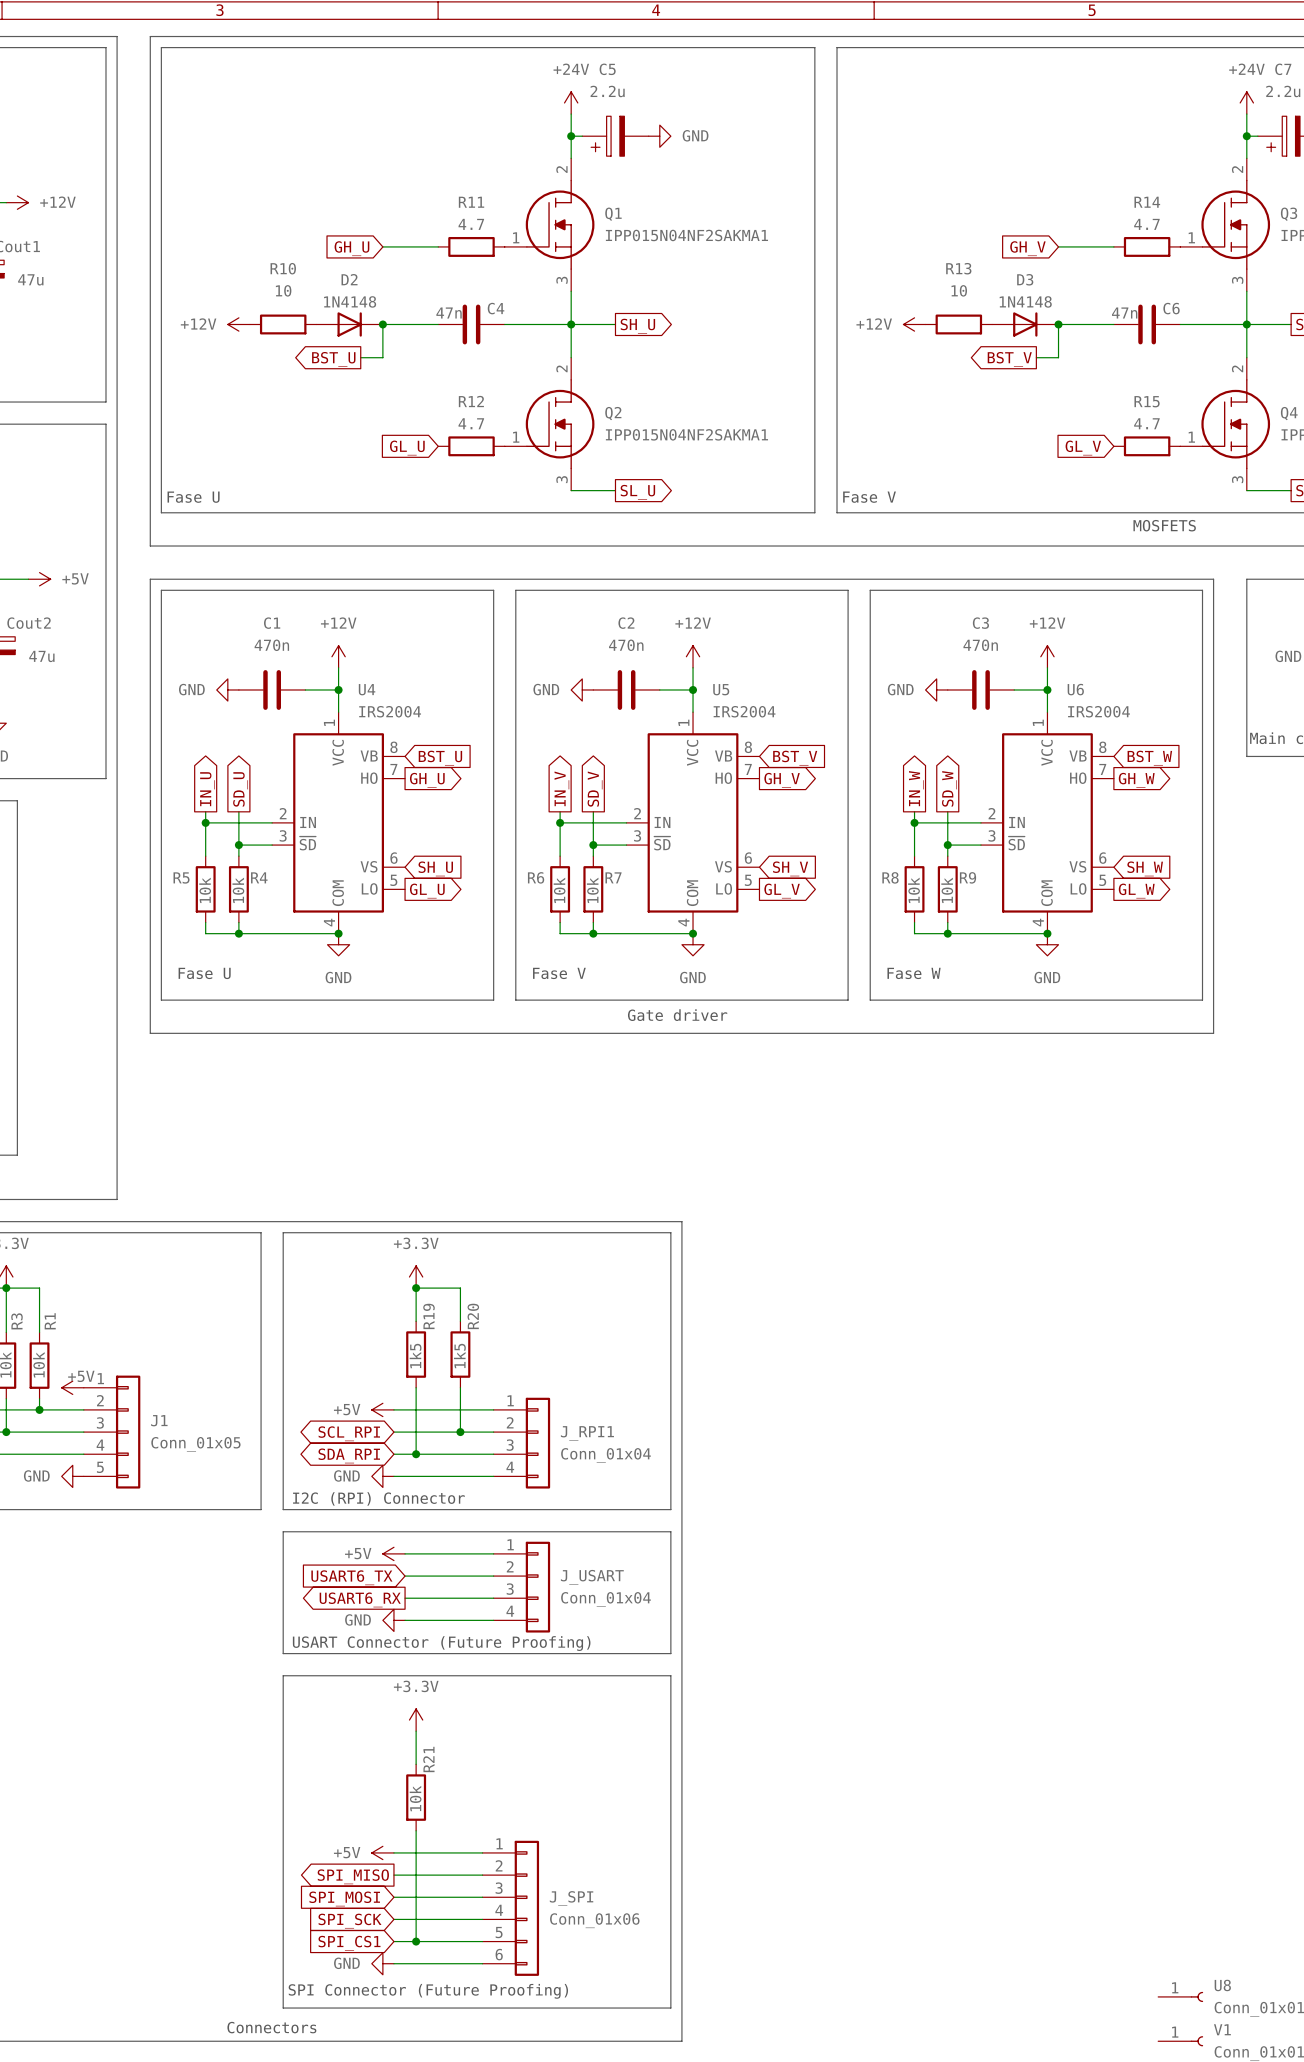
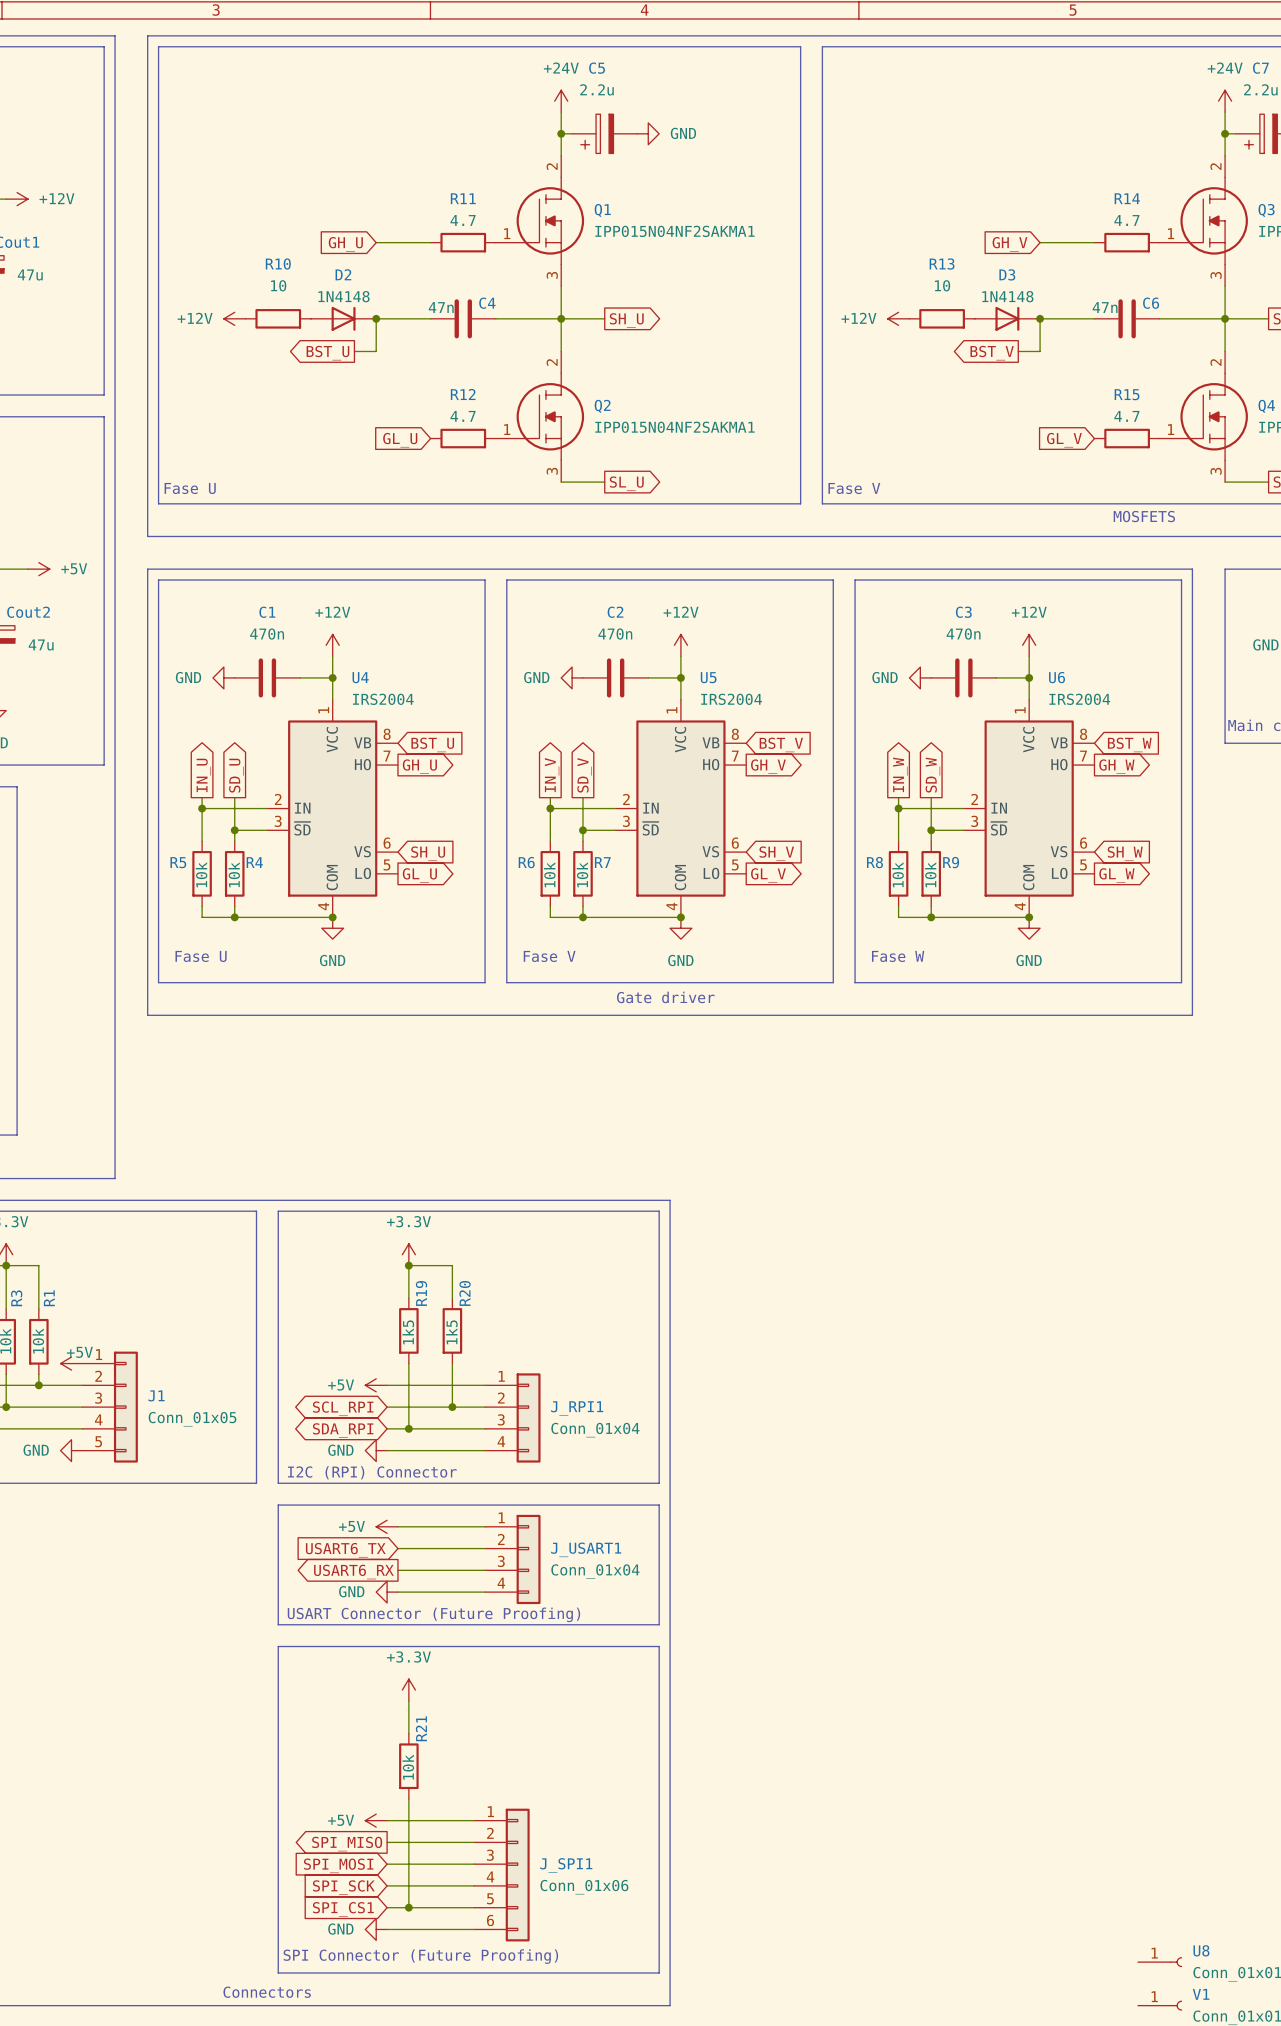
J_USART name: J_USART (592, 1577) -> J_USART1 (586, 1549)
J_SPI name: J_SPI (571, 1898) -> J_SPI1 (566, 1865)

